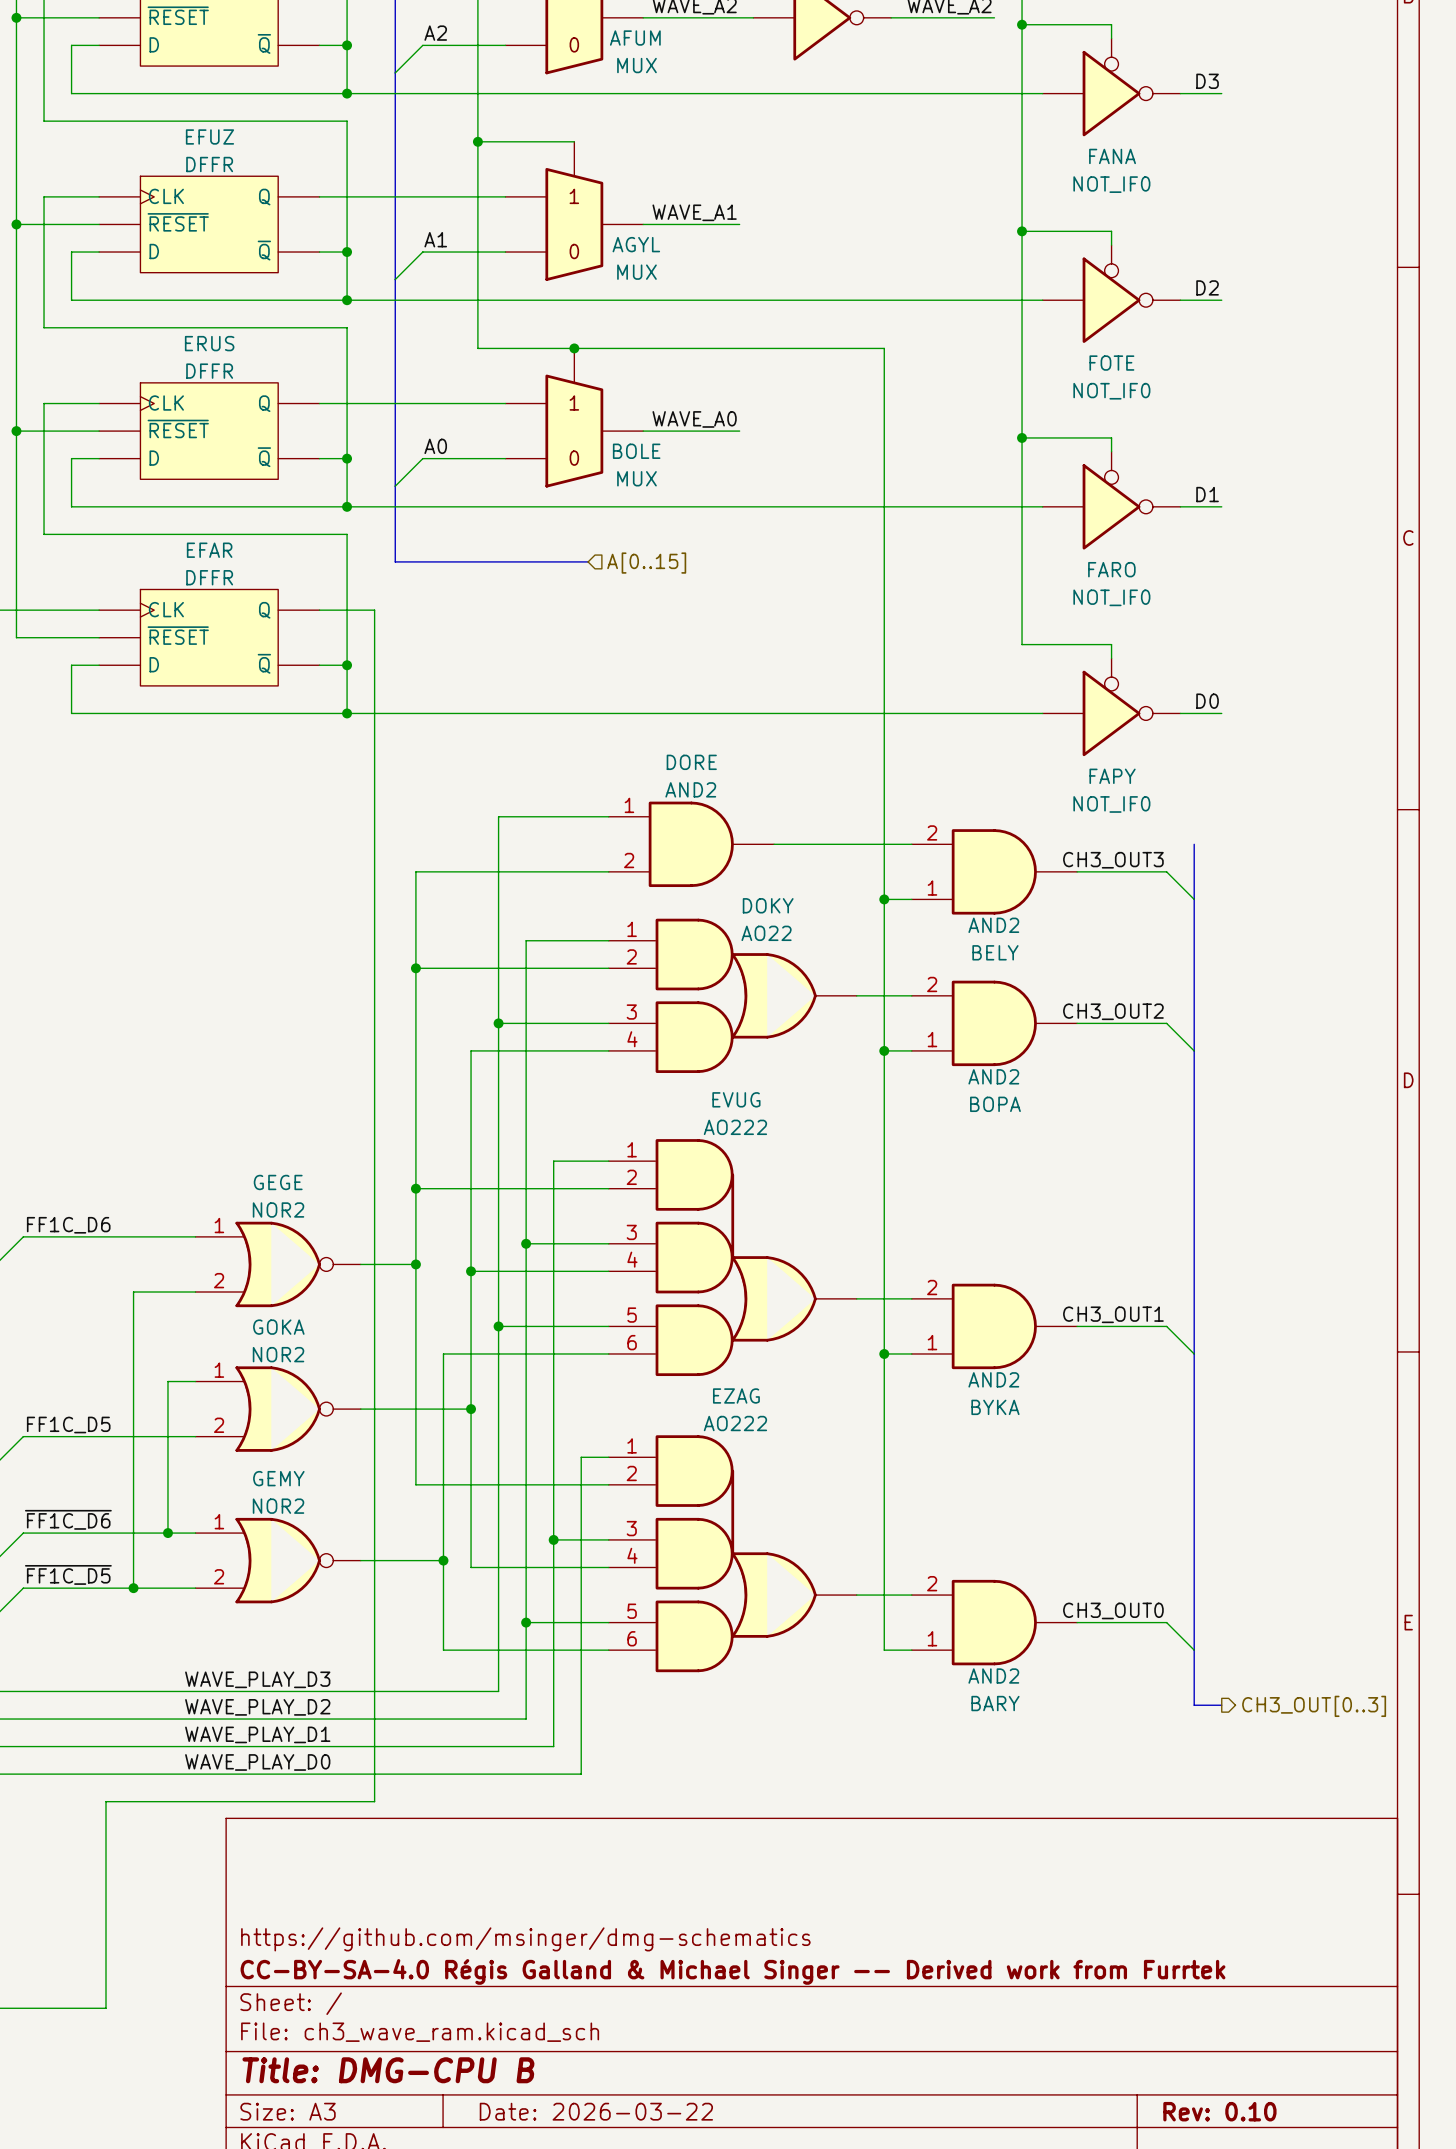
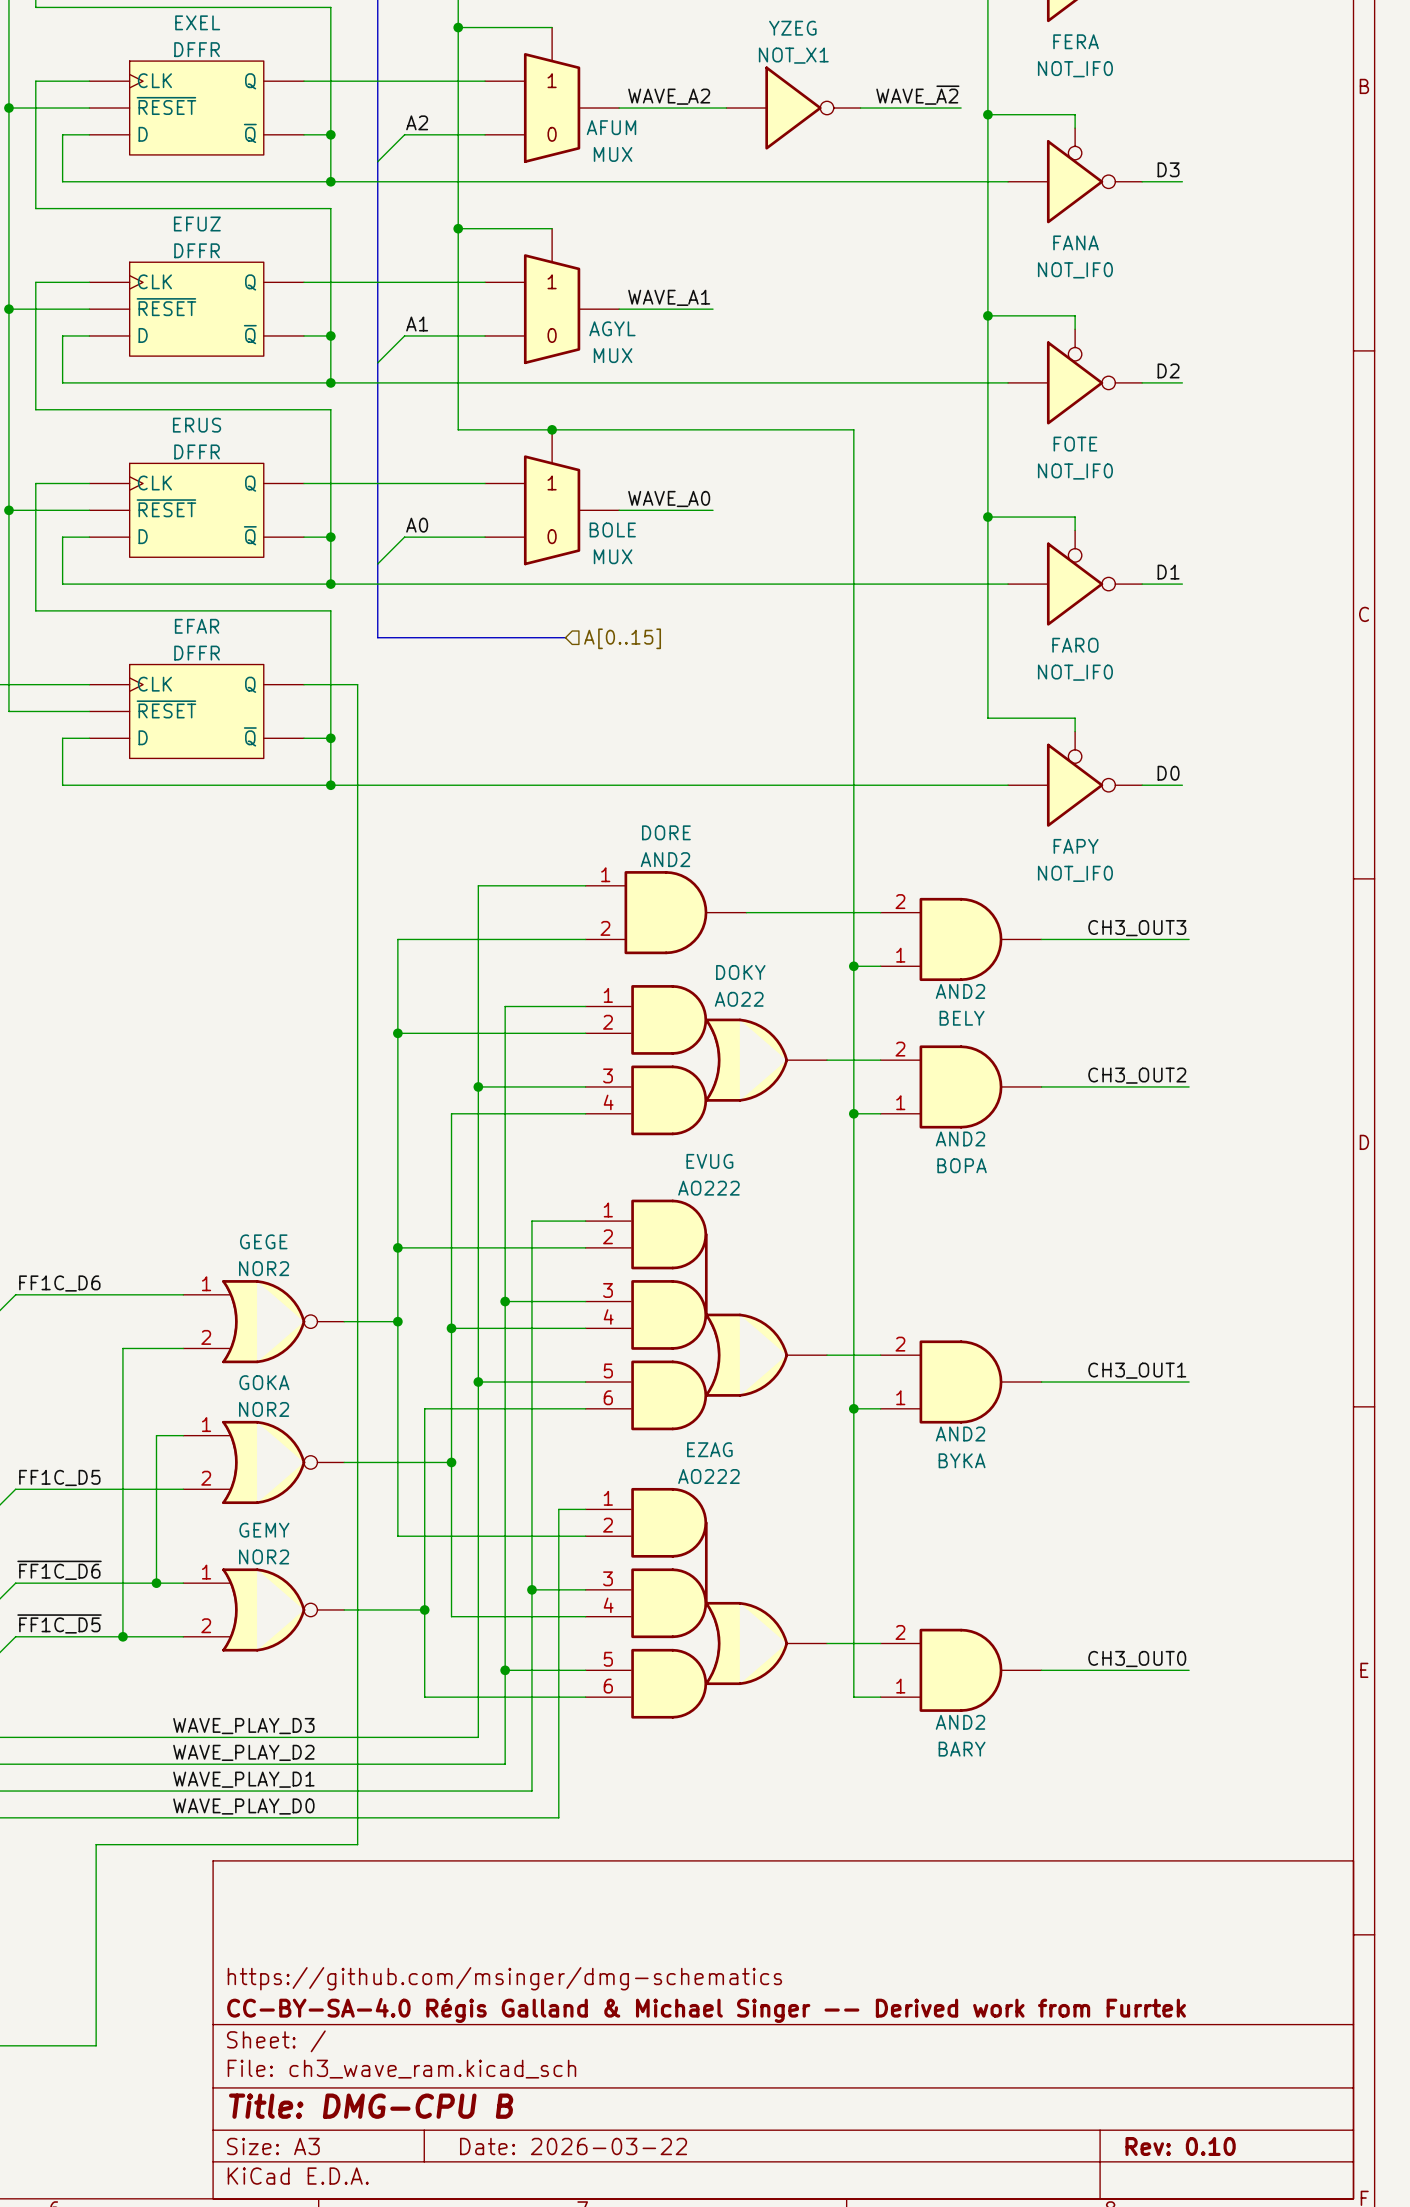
bus: (1194, 844) (1194, 1705) (1221, 1705) -> none
label position: CH3_OUT3 (1113, 860) -> CH3_OUT3 (1137, 928)
wire: (1166, 871) (1194, 899) -> (1128, 939) (1189, 939)
label position: CH3_OUT2 (1113, 1011) -> CH3_OUT2 (1137, 1075)
wire: (1166, 1023) (1194, 1050) -> (1128, 1086) (1189, 1086)
label position: CH3_OUT1 (1113, 1314) -> CH3_OUT1 (1137, 1370)
wire: (1166, 1326) (1194, 1353) -> (1128, 1382) (1189, 1382)
label position: CH3_OUT0 (1113, 1610) -> CH3_OUT0 (1137, 1658)
wire: (1166, 1622) (1194, 1650) -> (1128, 1670) (1189, 1670)
hierarchical label: CH3_OUT[0..3] (1314, 1706) -> none

